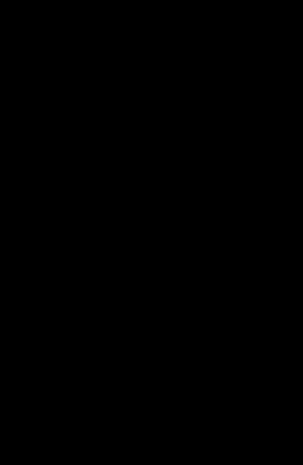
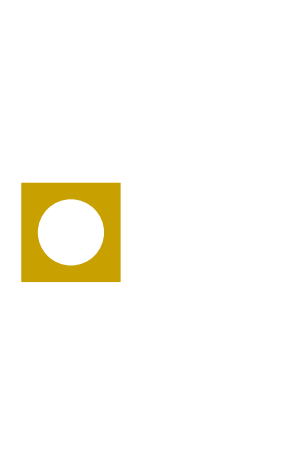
part: none -> (70, 232)

